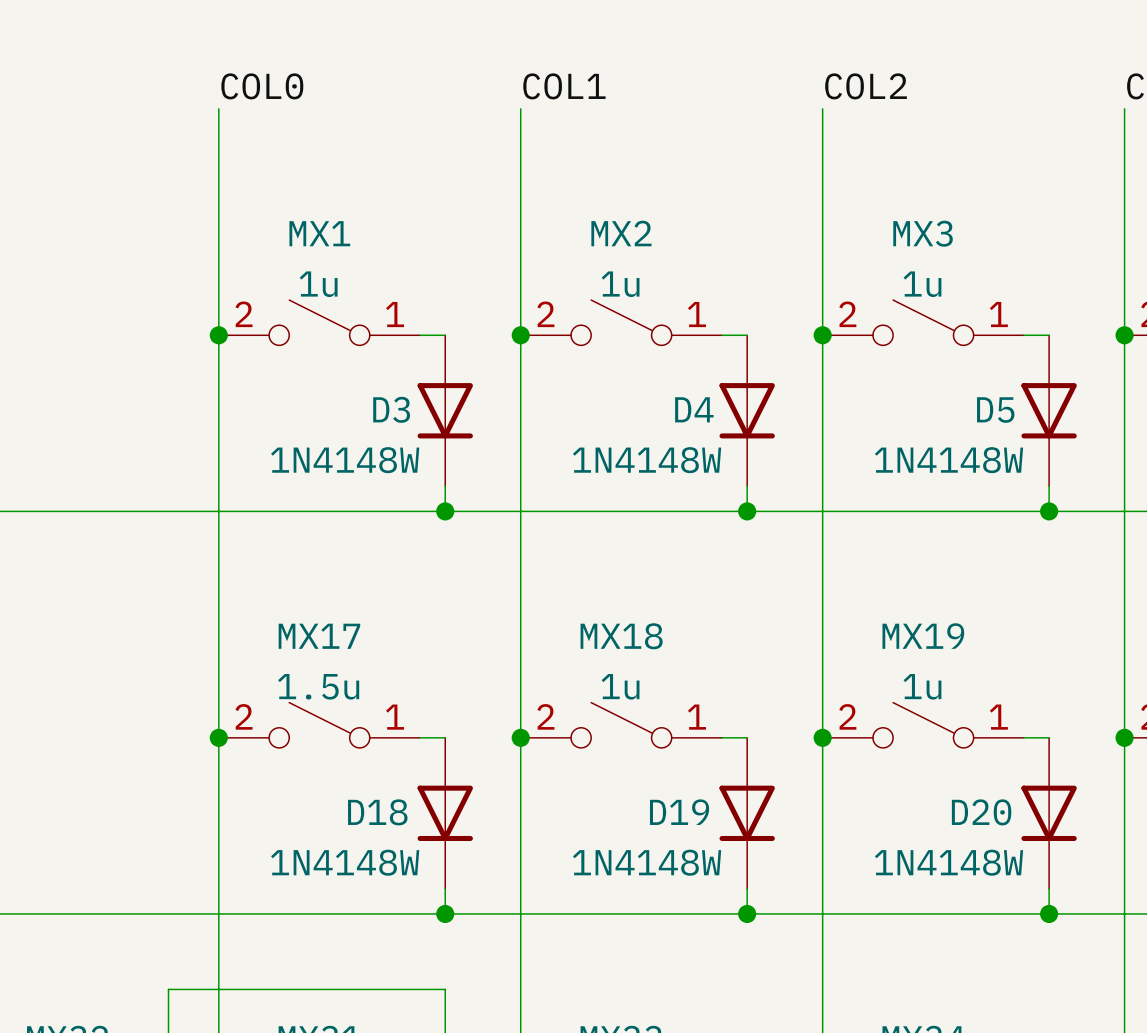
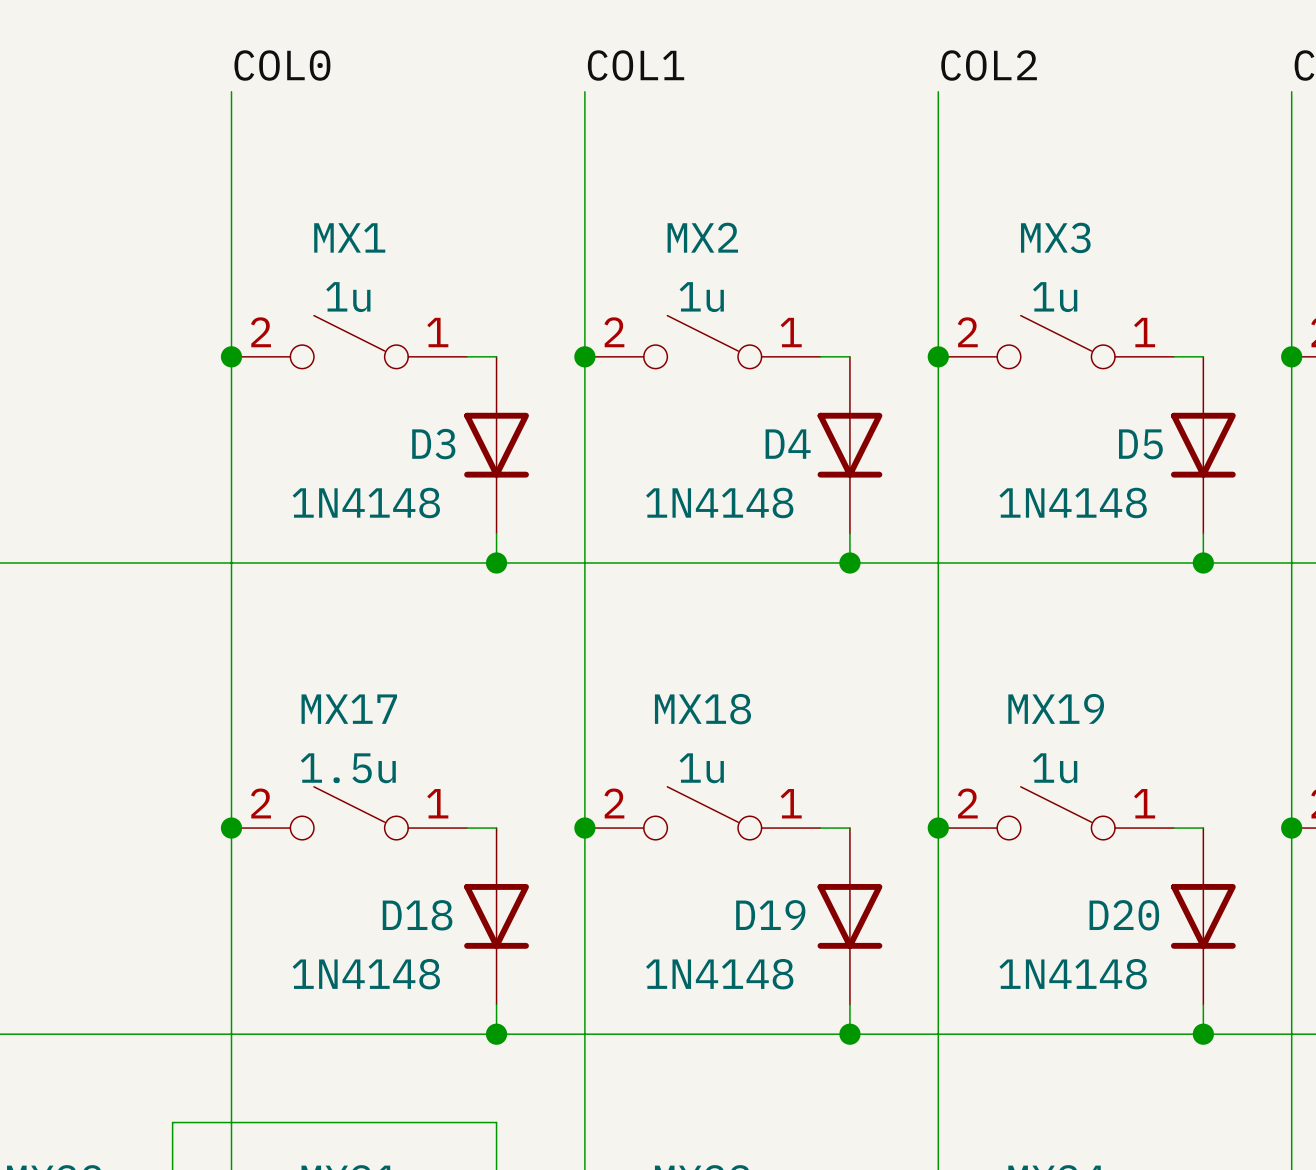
D3 value: 1N4148W (345, 460) -> 1N4148 (366, 502)
D4 value: 1N4148W (647, 460) -> 1N4148 (719, 502)
D5 value: 1N4148W (948, 460) -> 1N4148 (1073, 502)
D18 value: 1N4148W (345, 862) -> 1N4148 (366, 974)
D19 value: 1N4148W (647, 862) -> 1N4148 (719, 974)
D20 value: 1N4148W (948, 862) -> 1N4148 (1073, 974)

